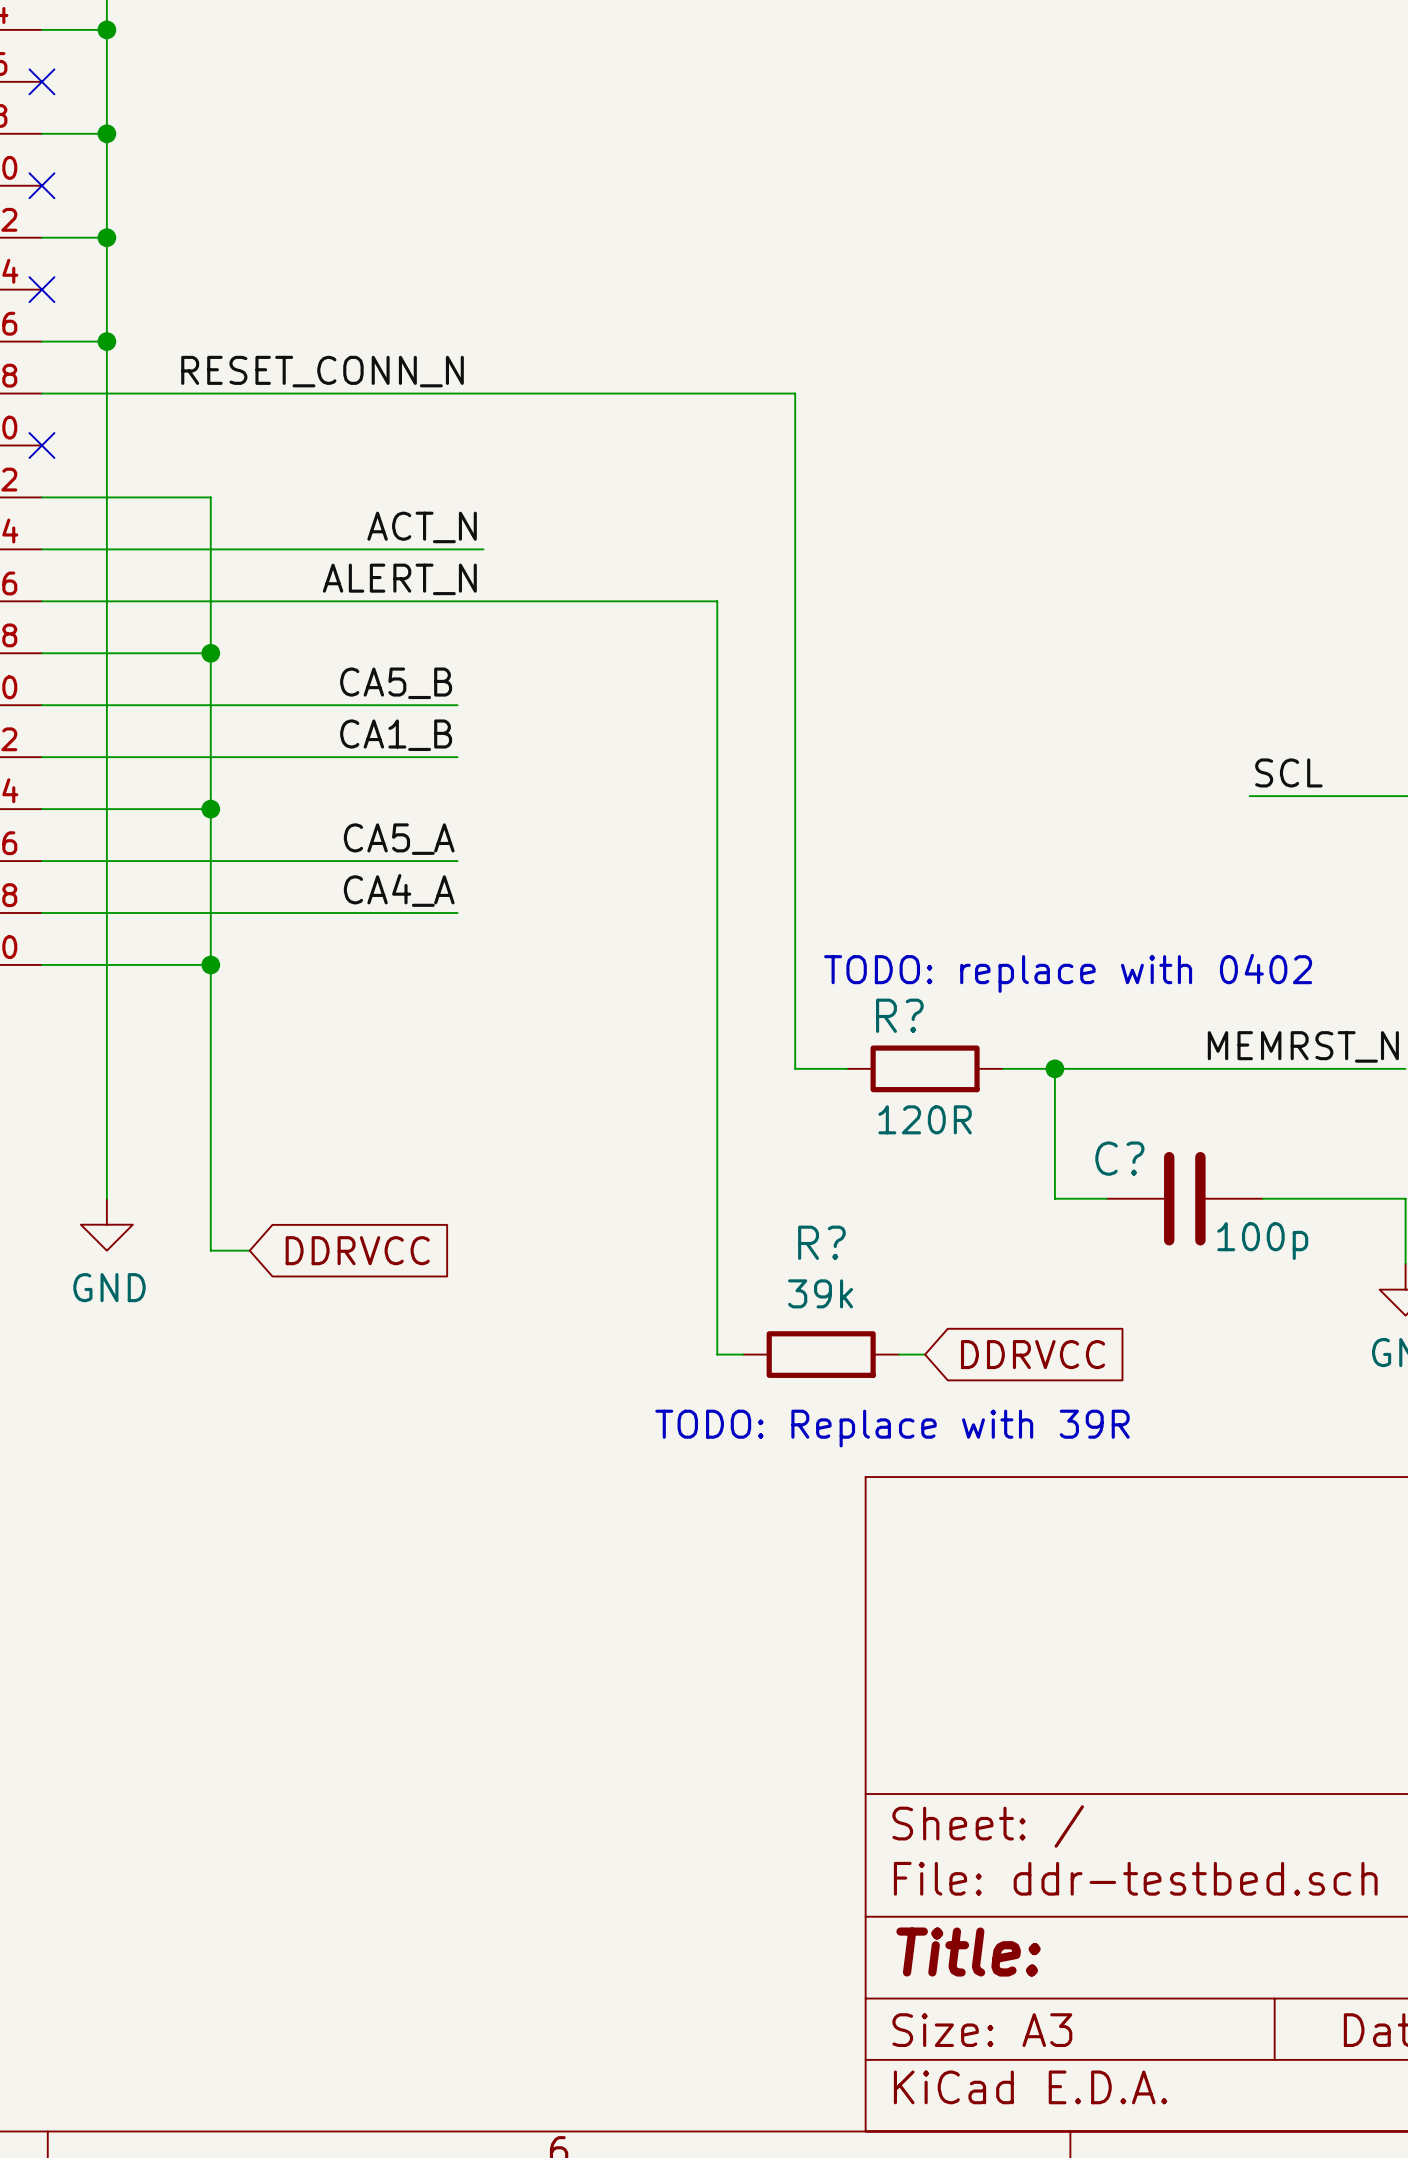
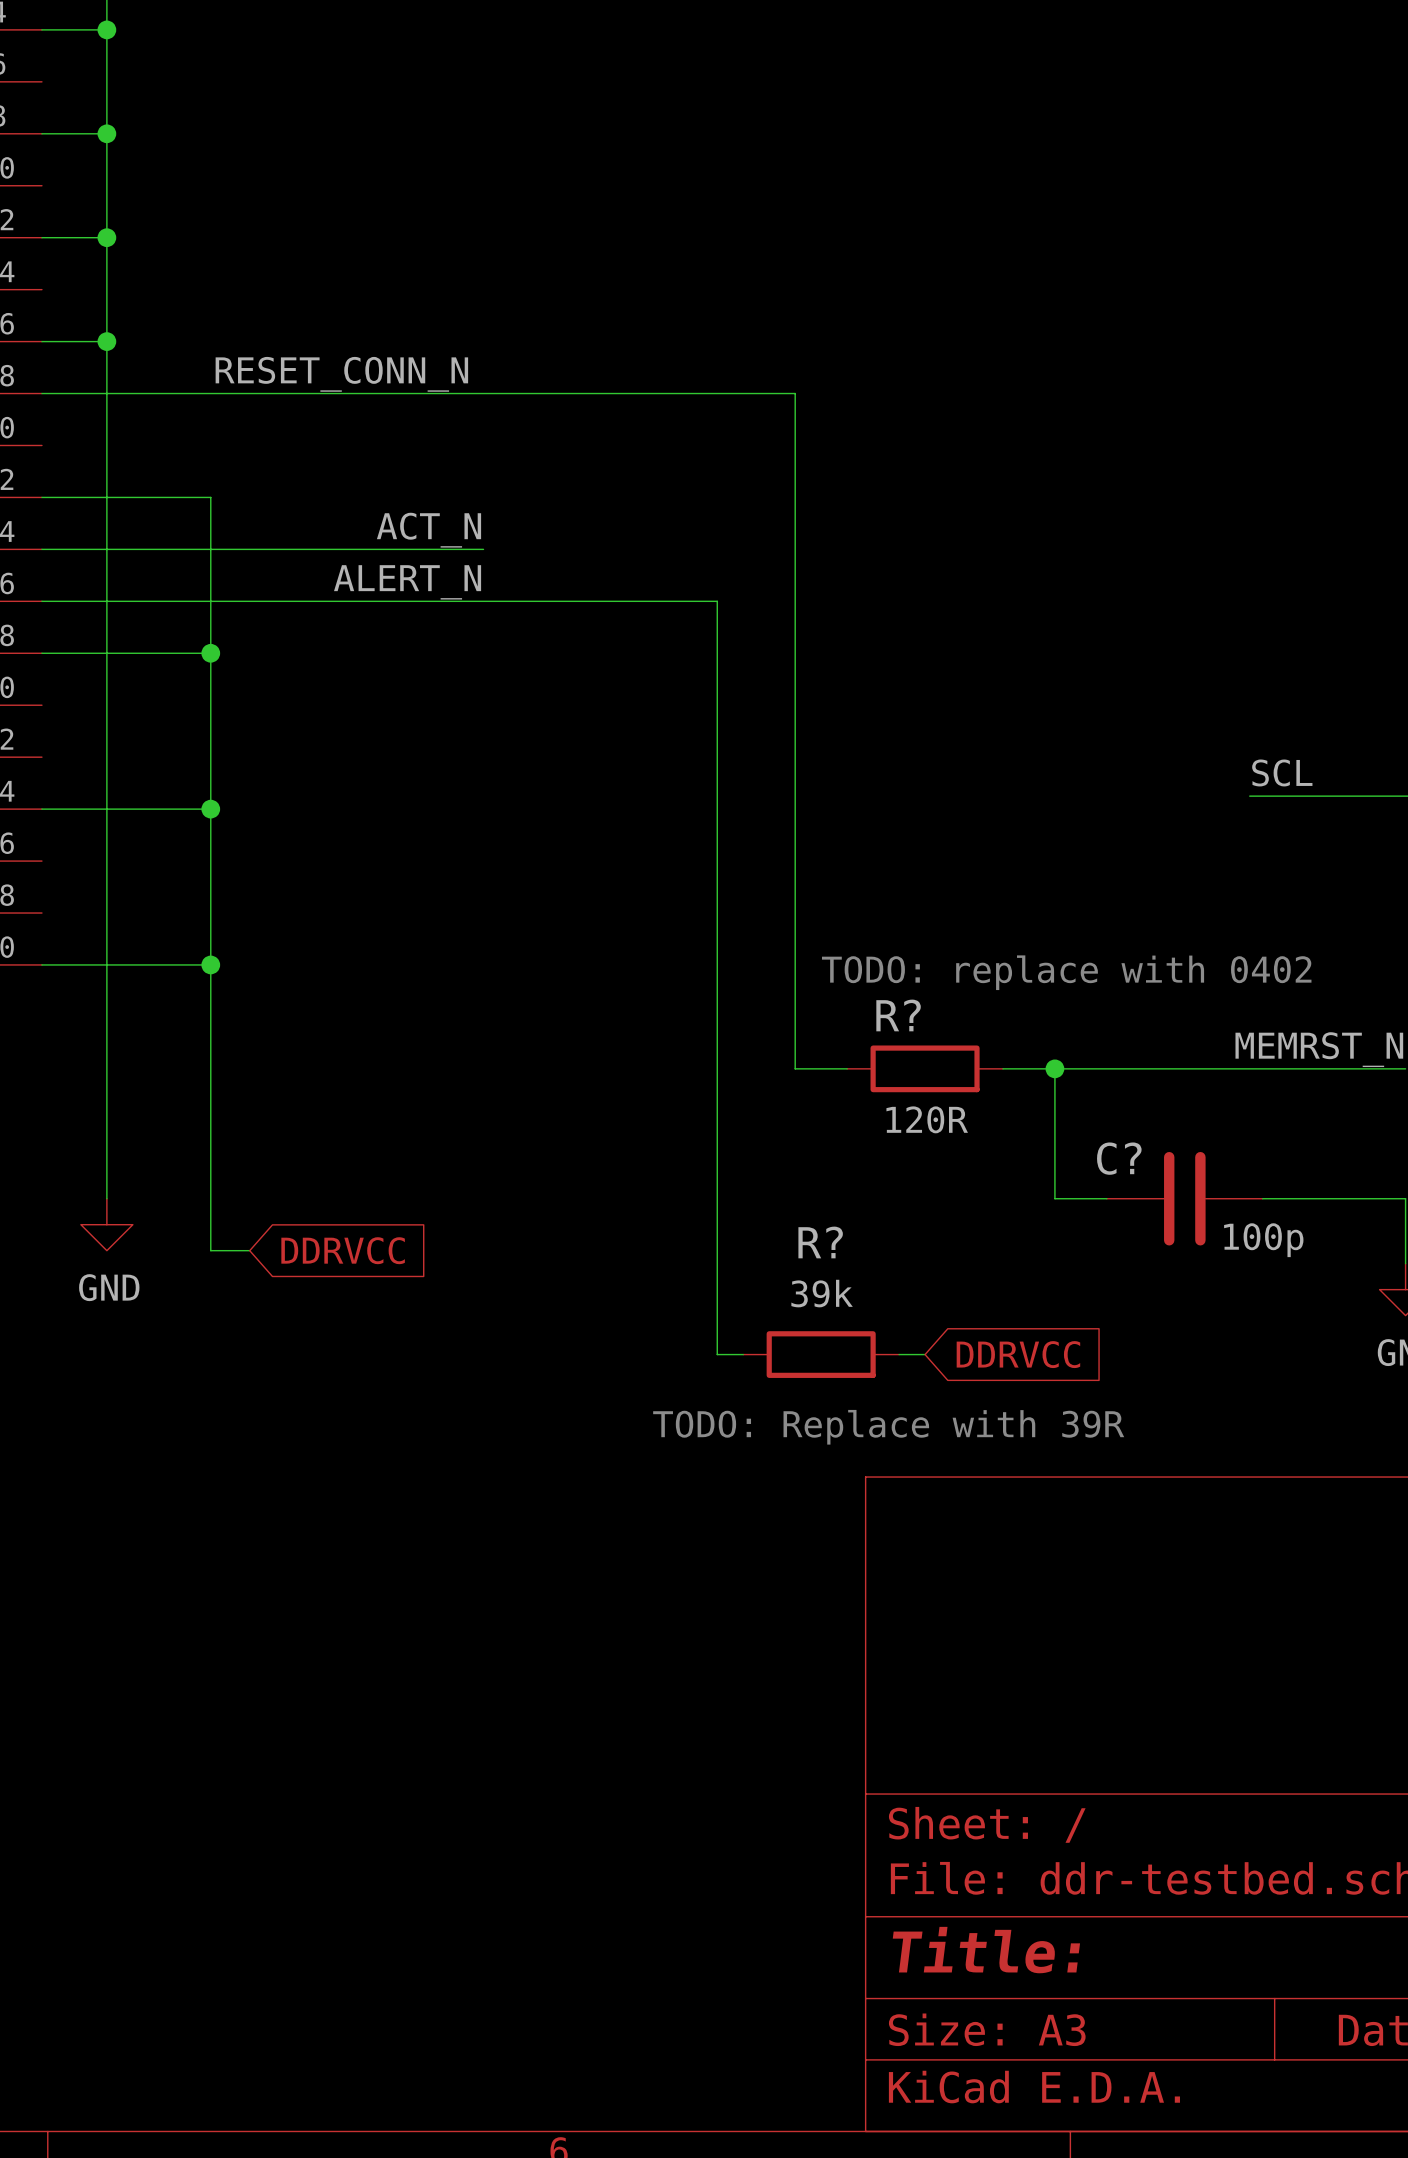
no-connect mark: (41, 81) -> none
no-connect mark: (41, 185) -> none
no-connect mark: (41, 289) -> none
no-connect mark: (41, 445) -> none
label: CA5_B (396, 683) -> none
wire: (41, 705) (457, 705) -> none
label: CA1_B (396, 735) -> none
wire: (41, 757) (457, 757) -> none
label: CA5_A (399, 839) -> none
wire: (41, 861) (457, 861) -> none
label: CA4_A (399, 890) -> none
wire: (41, 913) (457, 913) -> none

